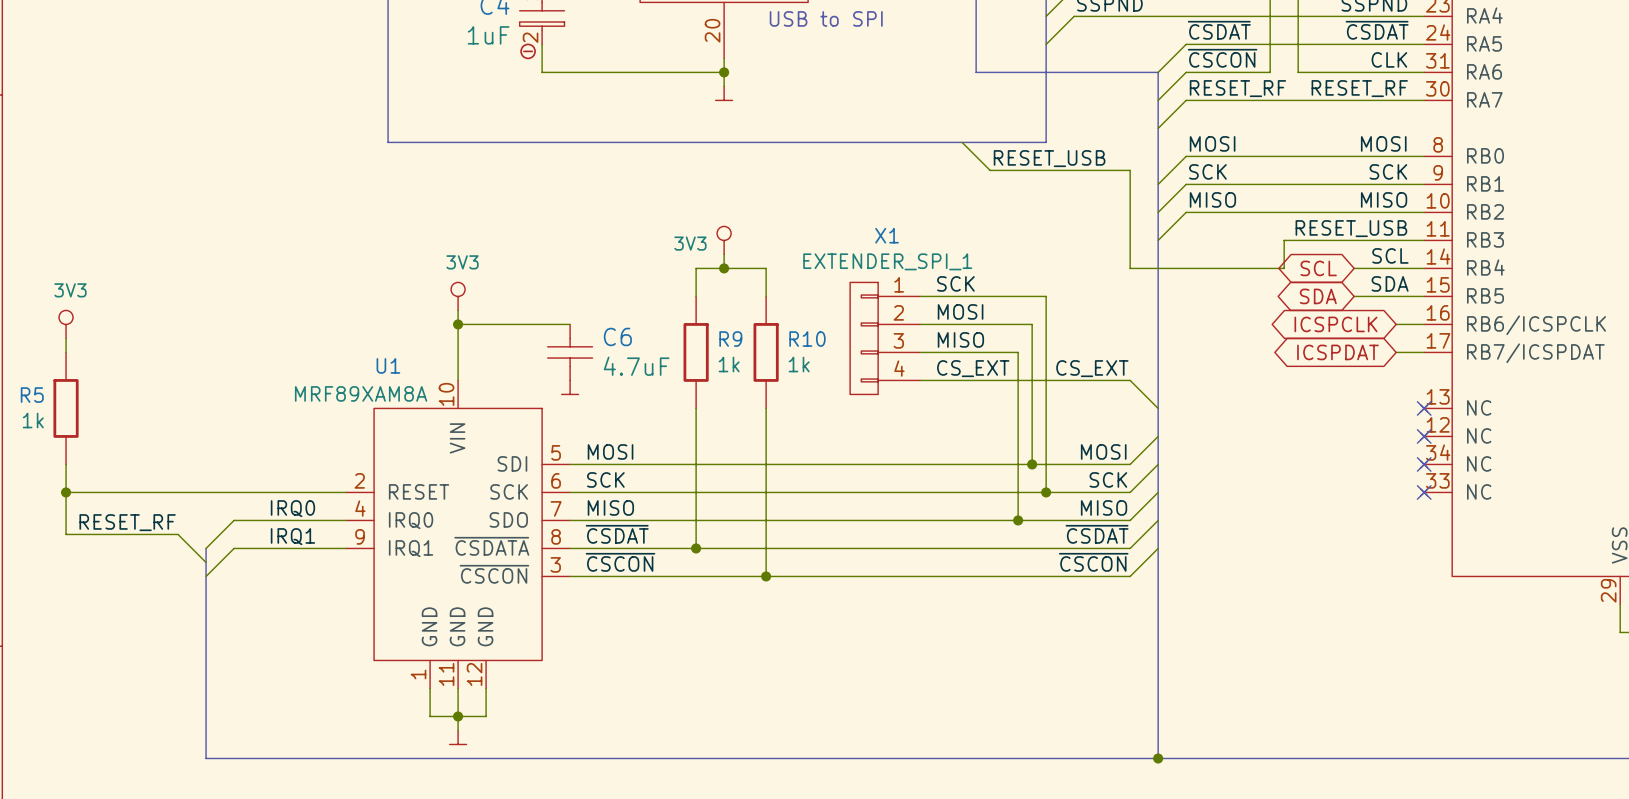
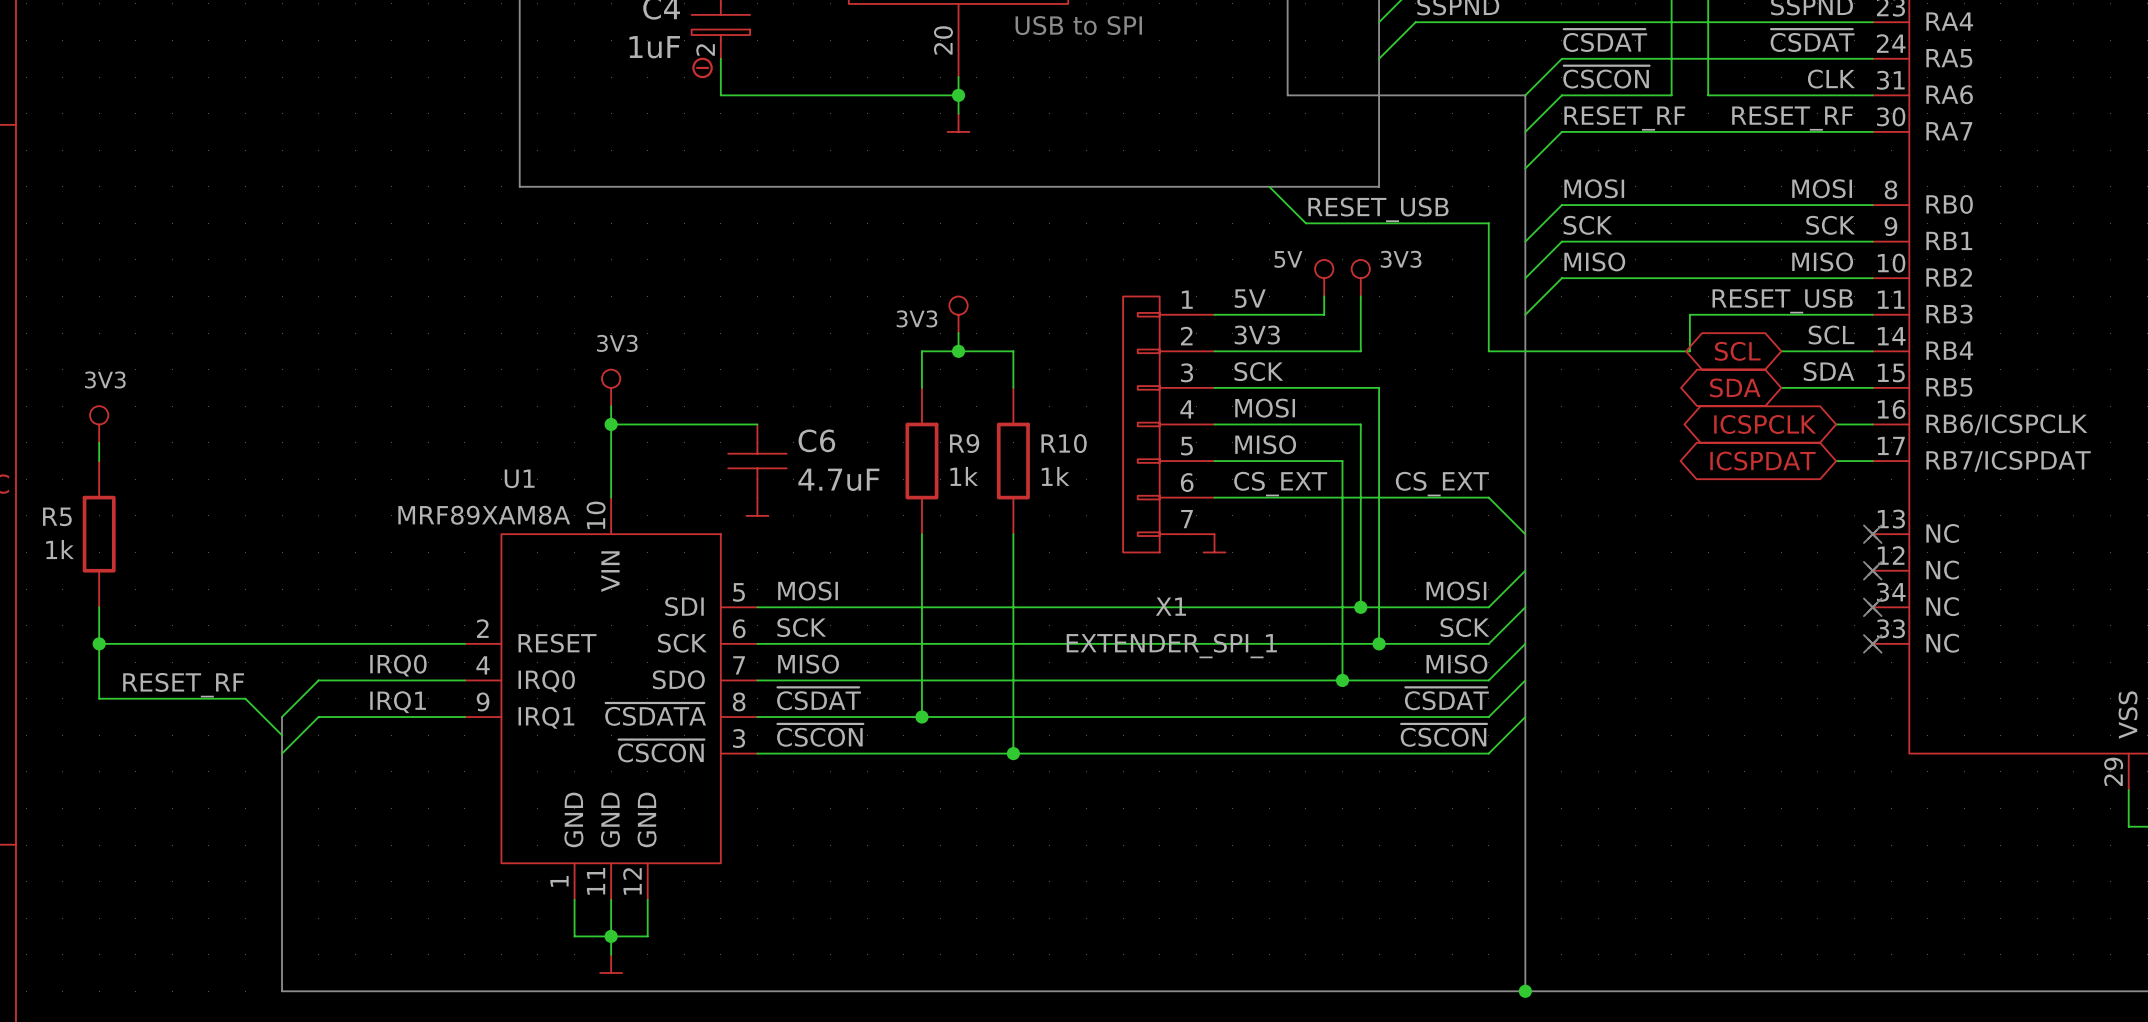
power symbol: none -> 5V (1324, 278)
power symbol: none -> 3V3 (1360, 278)
wire: none -> (1324, 296) (1324, 314) (1214, 314)
wire: none -> (1360, 296) (1360, 351) (1214, 351)
label: none -> 5V (1250, 298)
X1 name position: X1 (887, 235) -> X1 (1170, 606)
label: none -> 3V3 (1257, 335)
X1 value position: EXTENDER_SPI_1 (887, 261) -> EXTENDER_SPI_1 (1171, 645)
X1 symbol: [850, 282, 921, 395] -> [1123, 296, 1215, 553]
power symbol: none -> (1214, 543)

